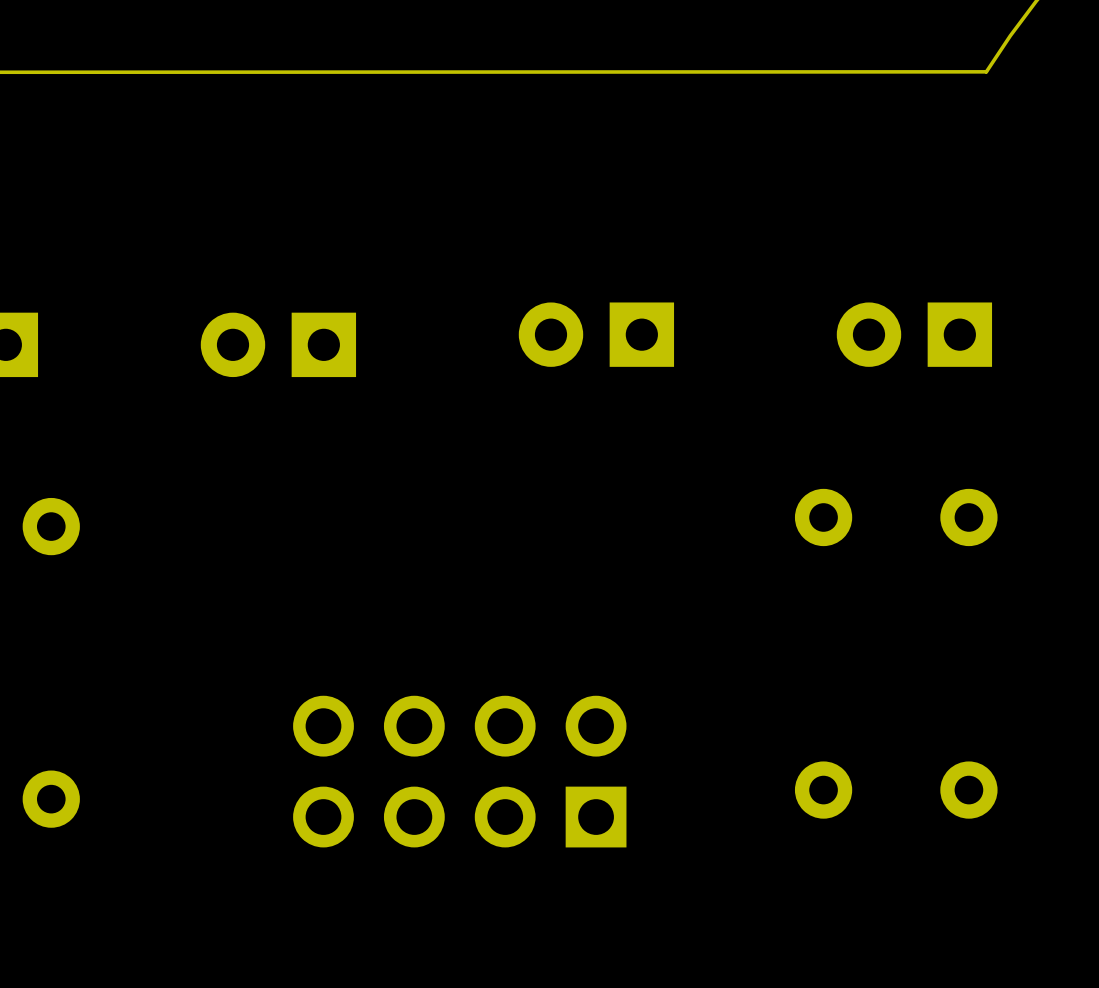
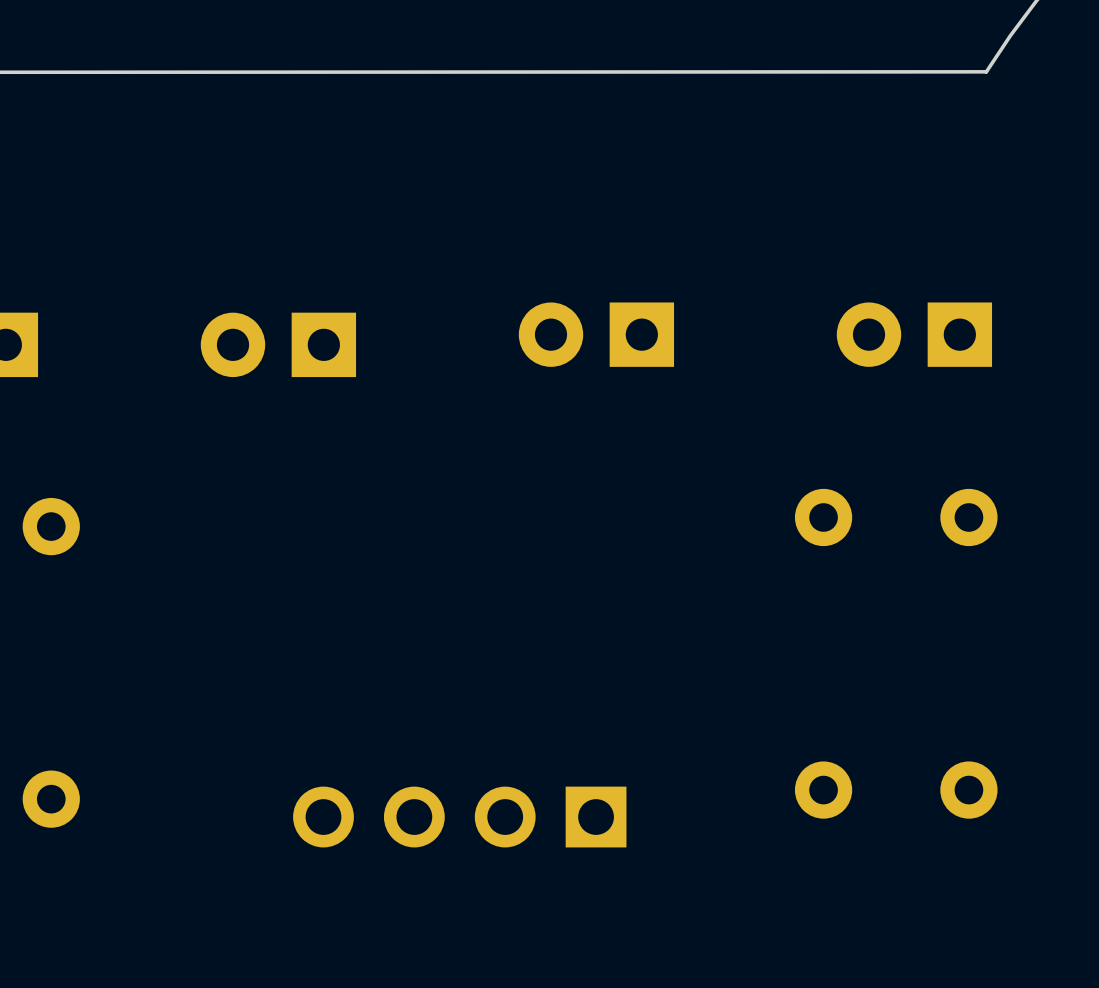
part: (459, 771) -> none

